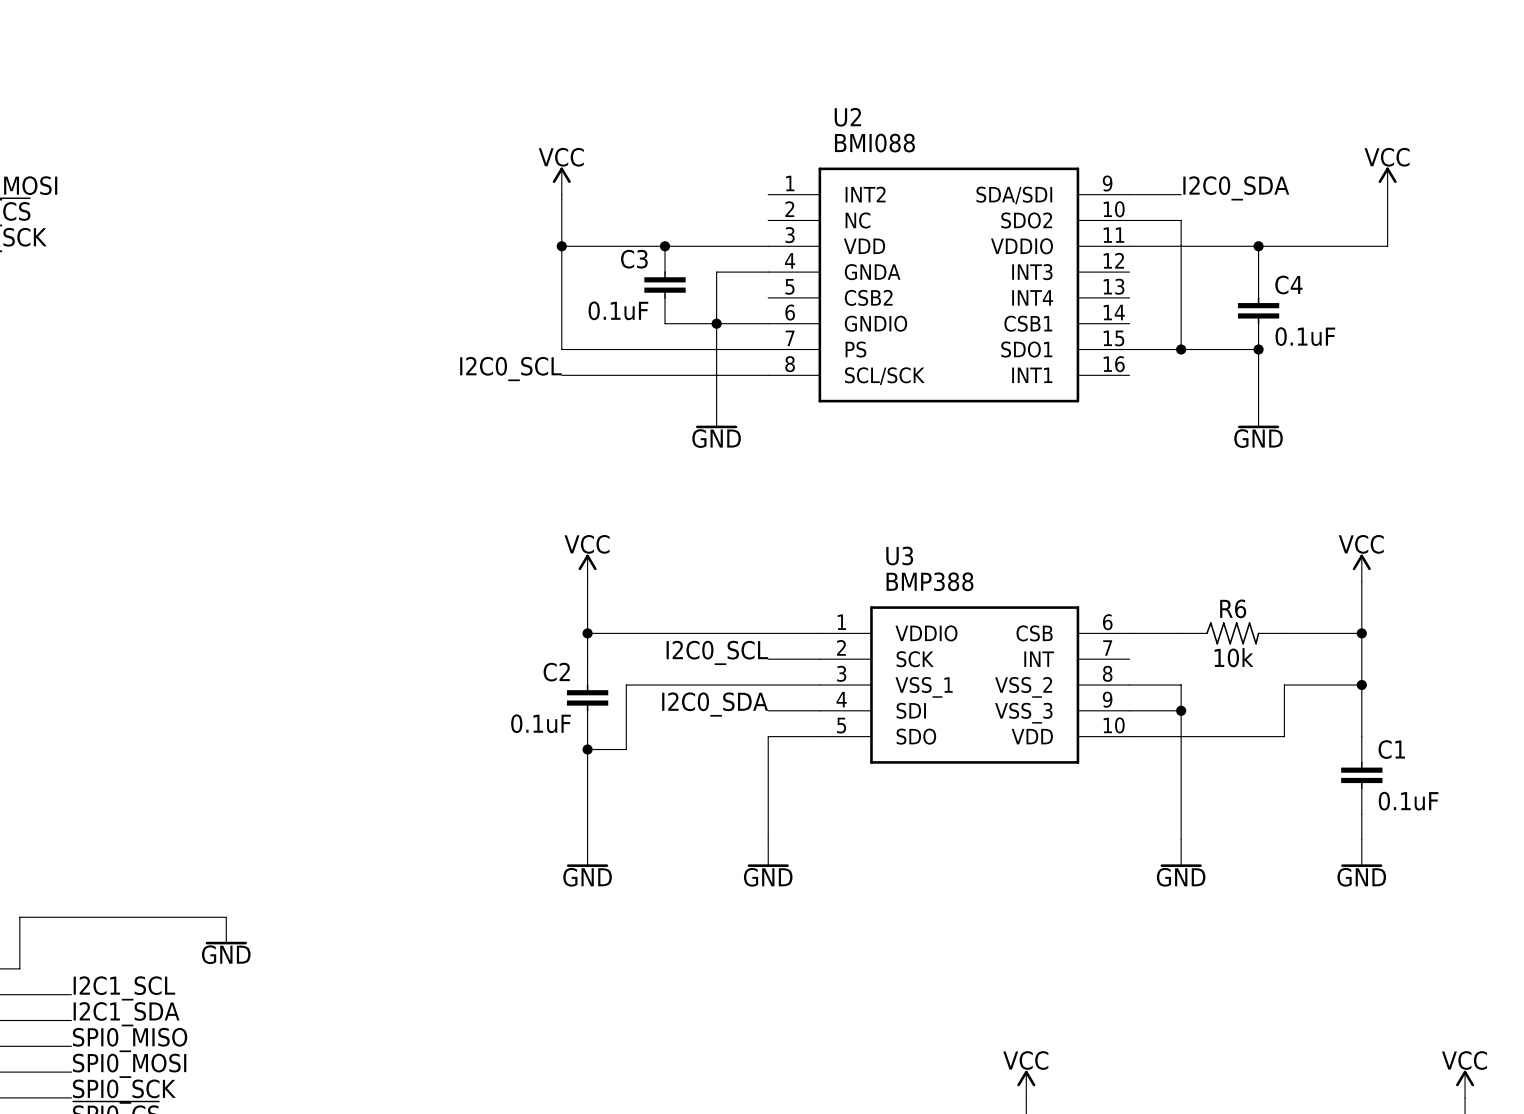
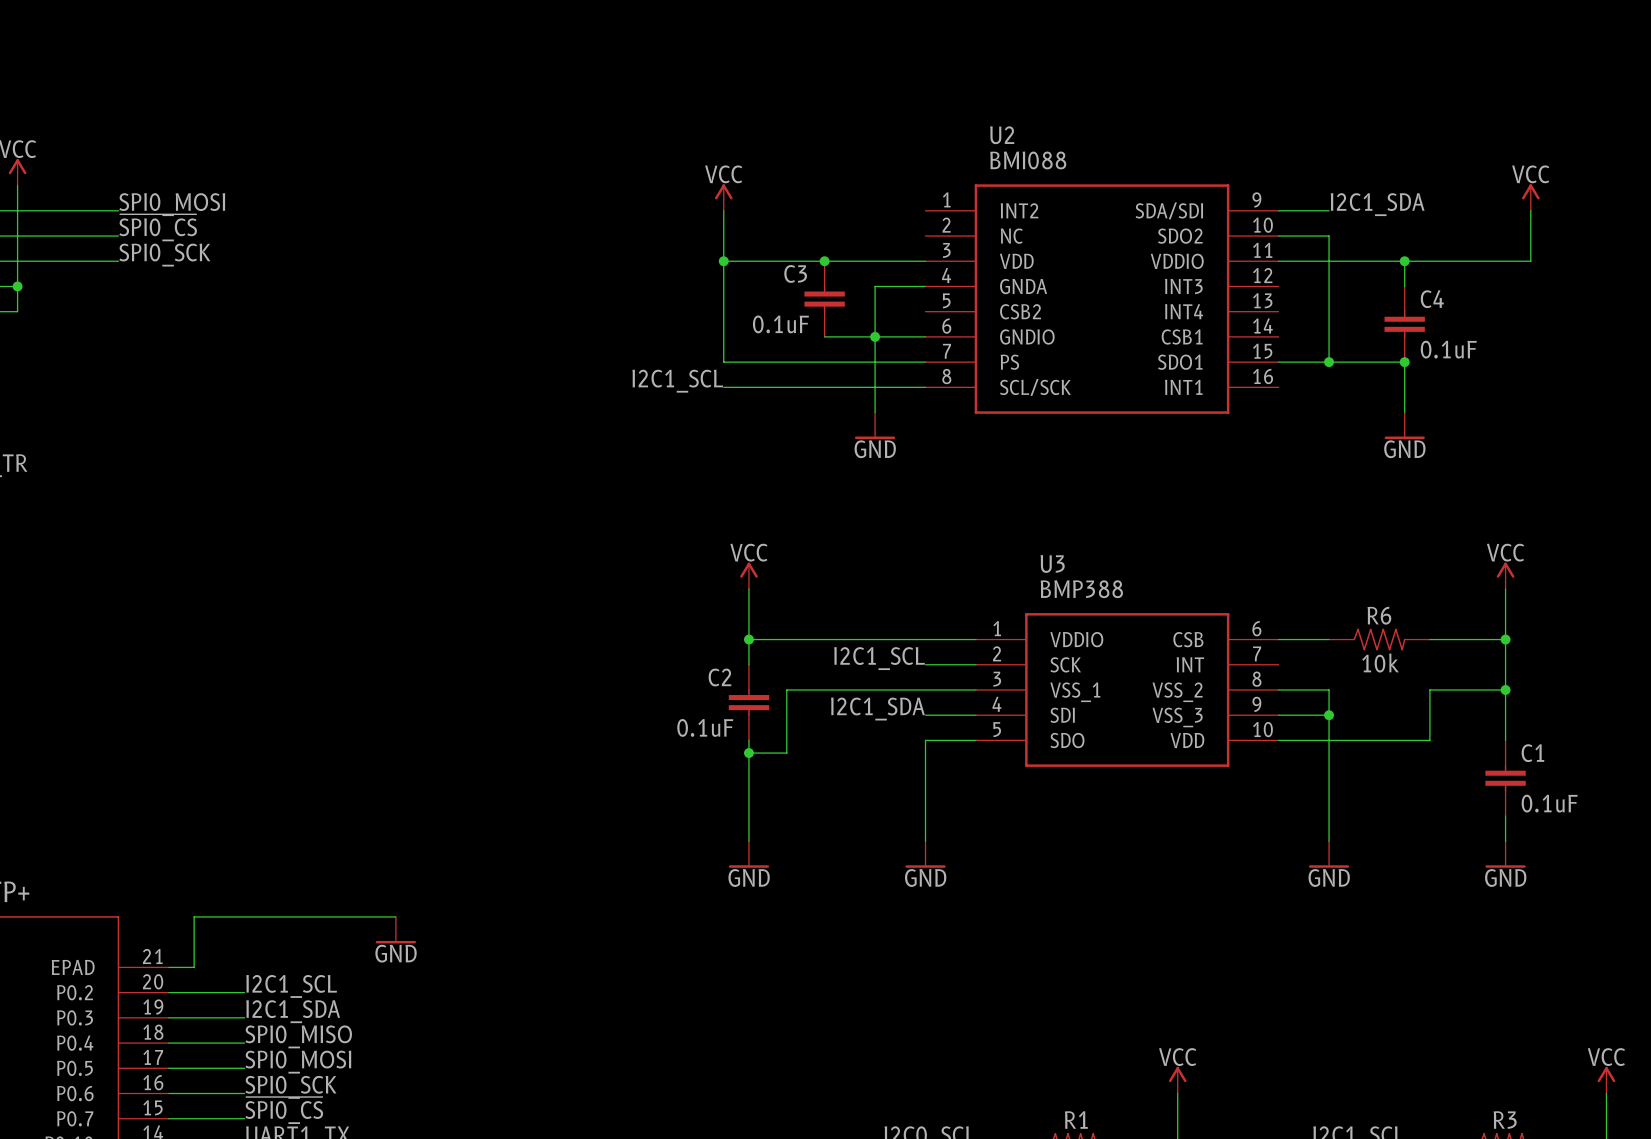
label: I2C0_SDA (1236, 188) -> I2C1_SDA (1377, 204)
label: I2C0_SCL (510, 369) -> I2C1_SCL (677, 381)
label: I2C0_SCL (717, 652) -> I2C1_SCL (879, 658)
label: I2C0_SDA (715, 704) -> I2C1_SDA (877, 709)

